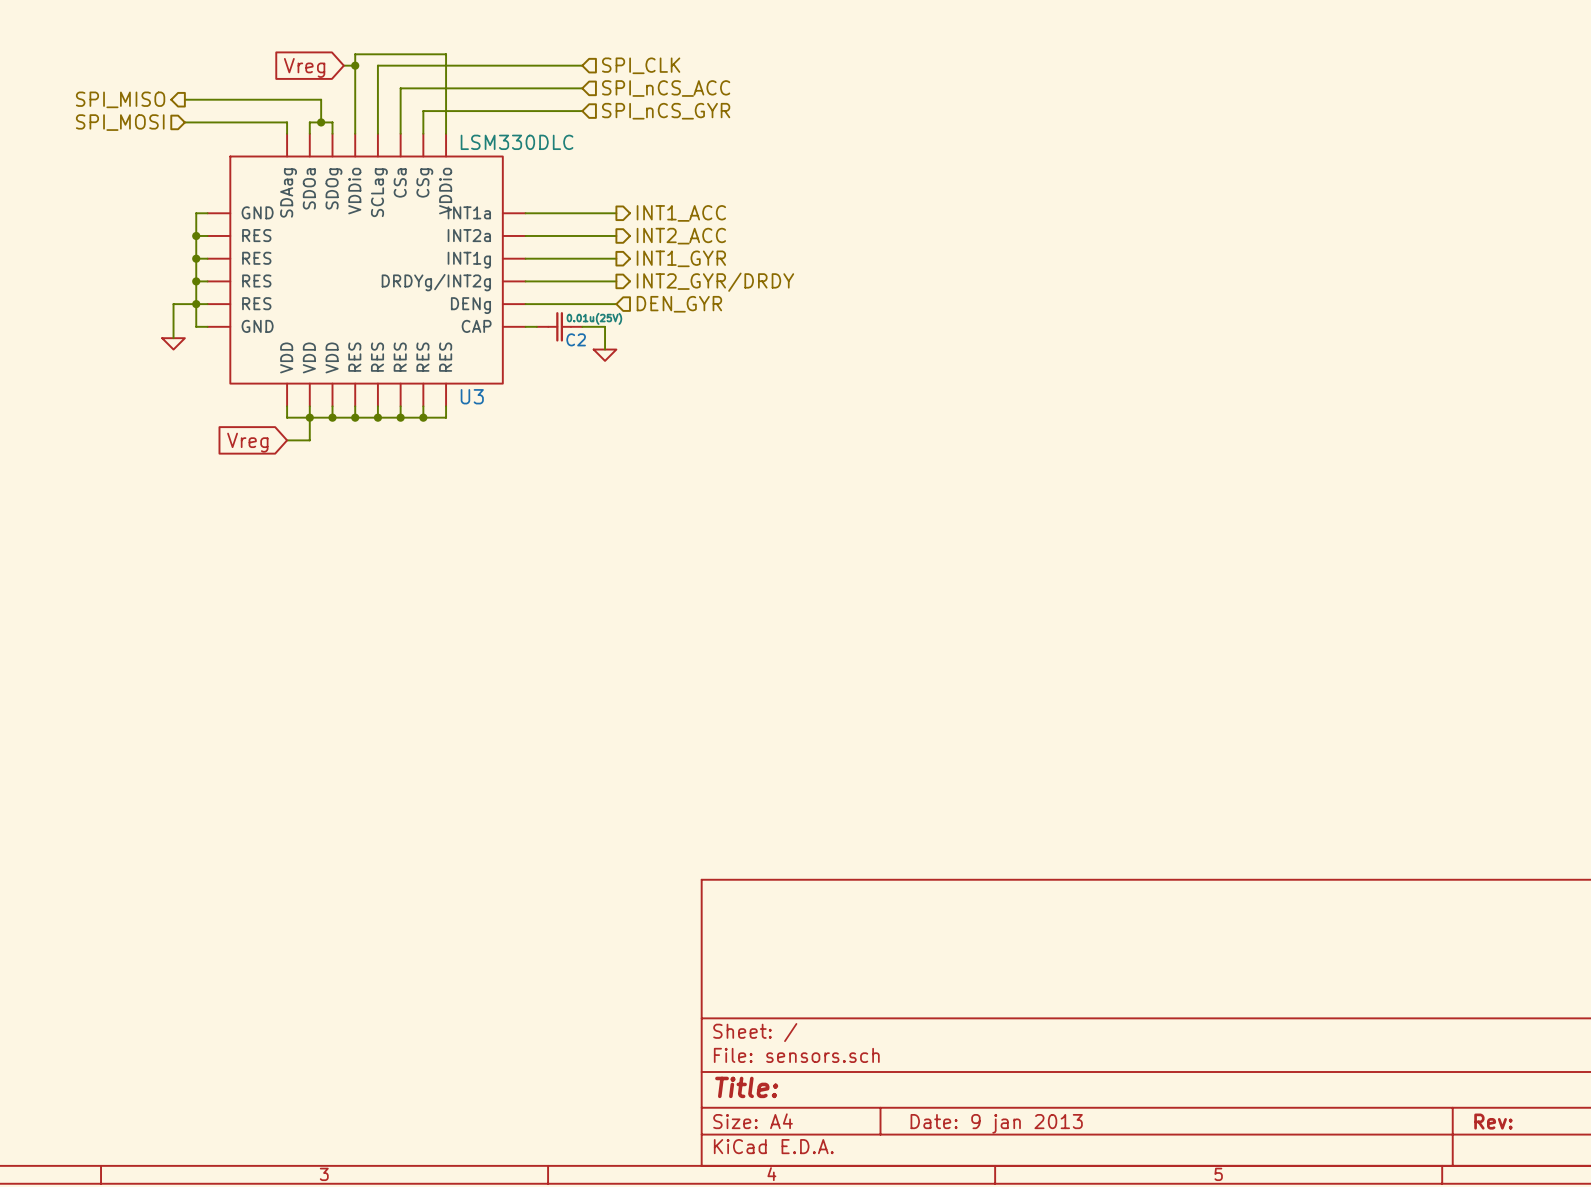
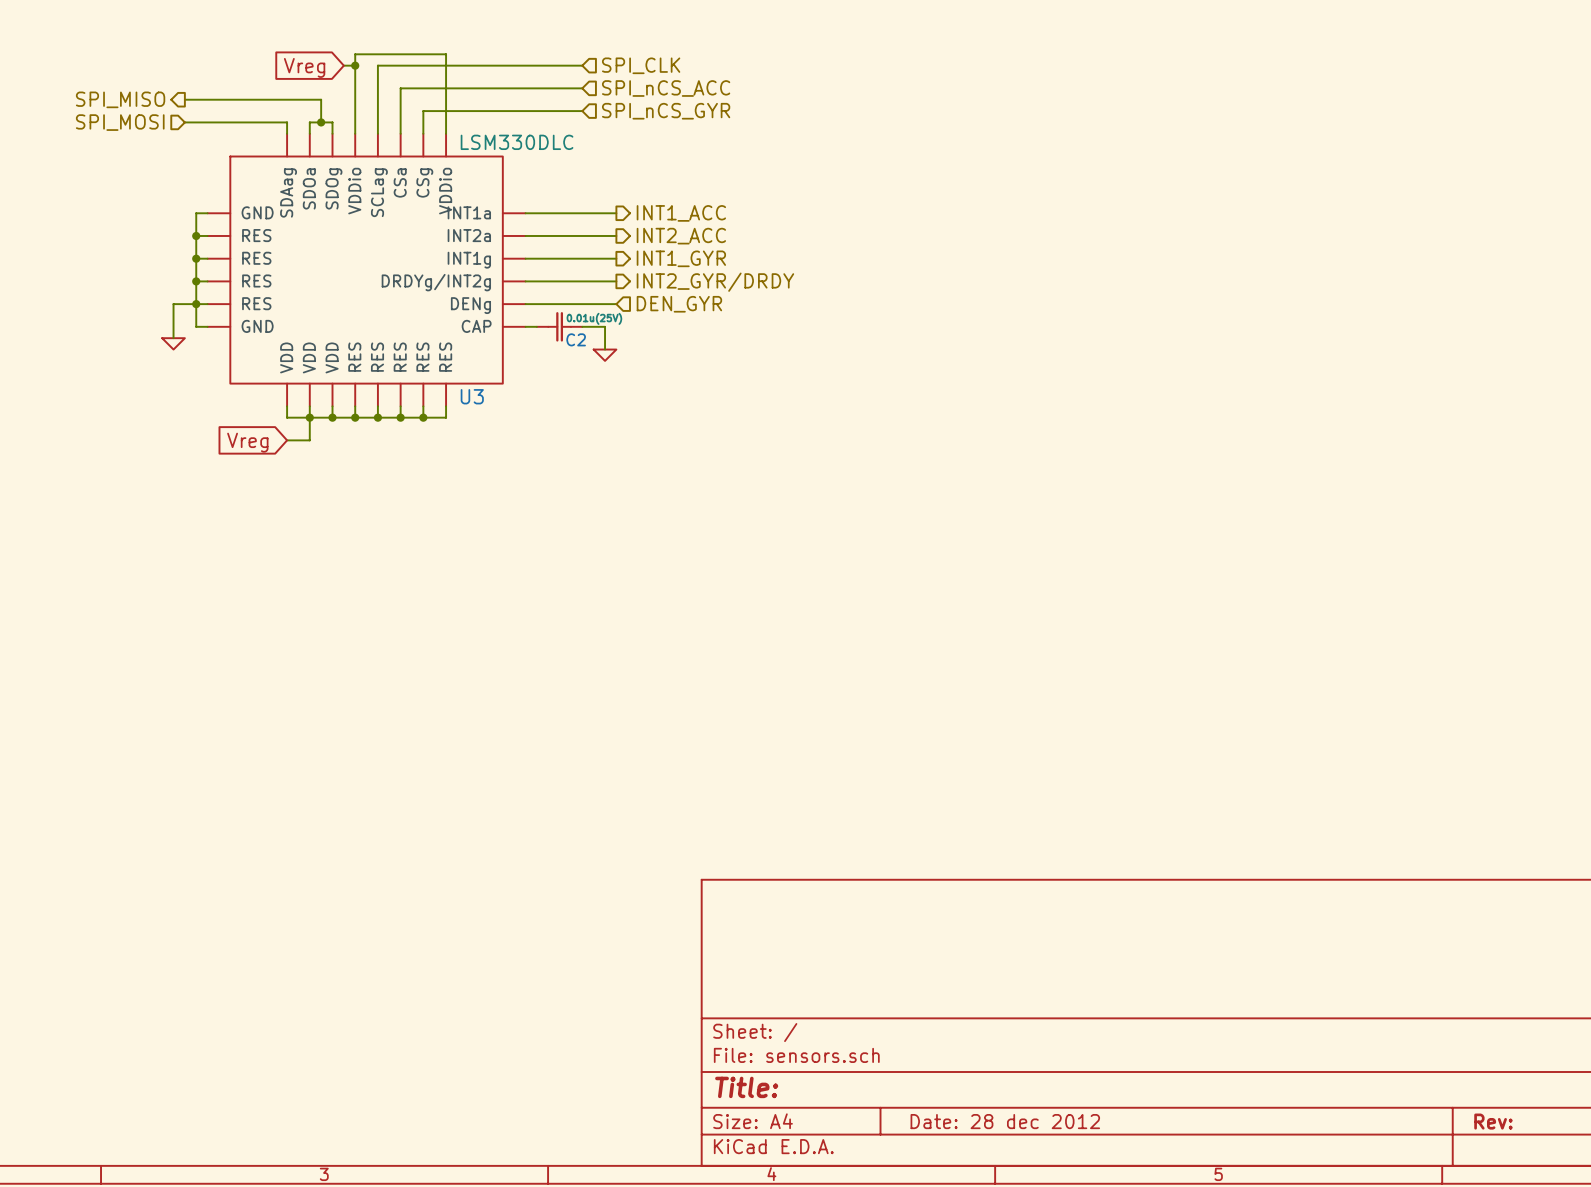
title block: Date: 9 jan 2013 (996, 1123) -> Date: 28 dec 2012 (1005, 1121)

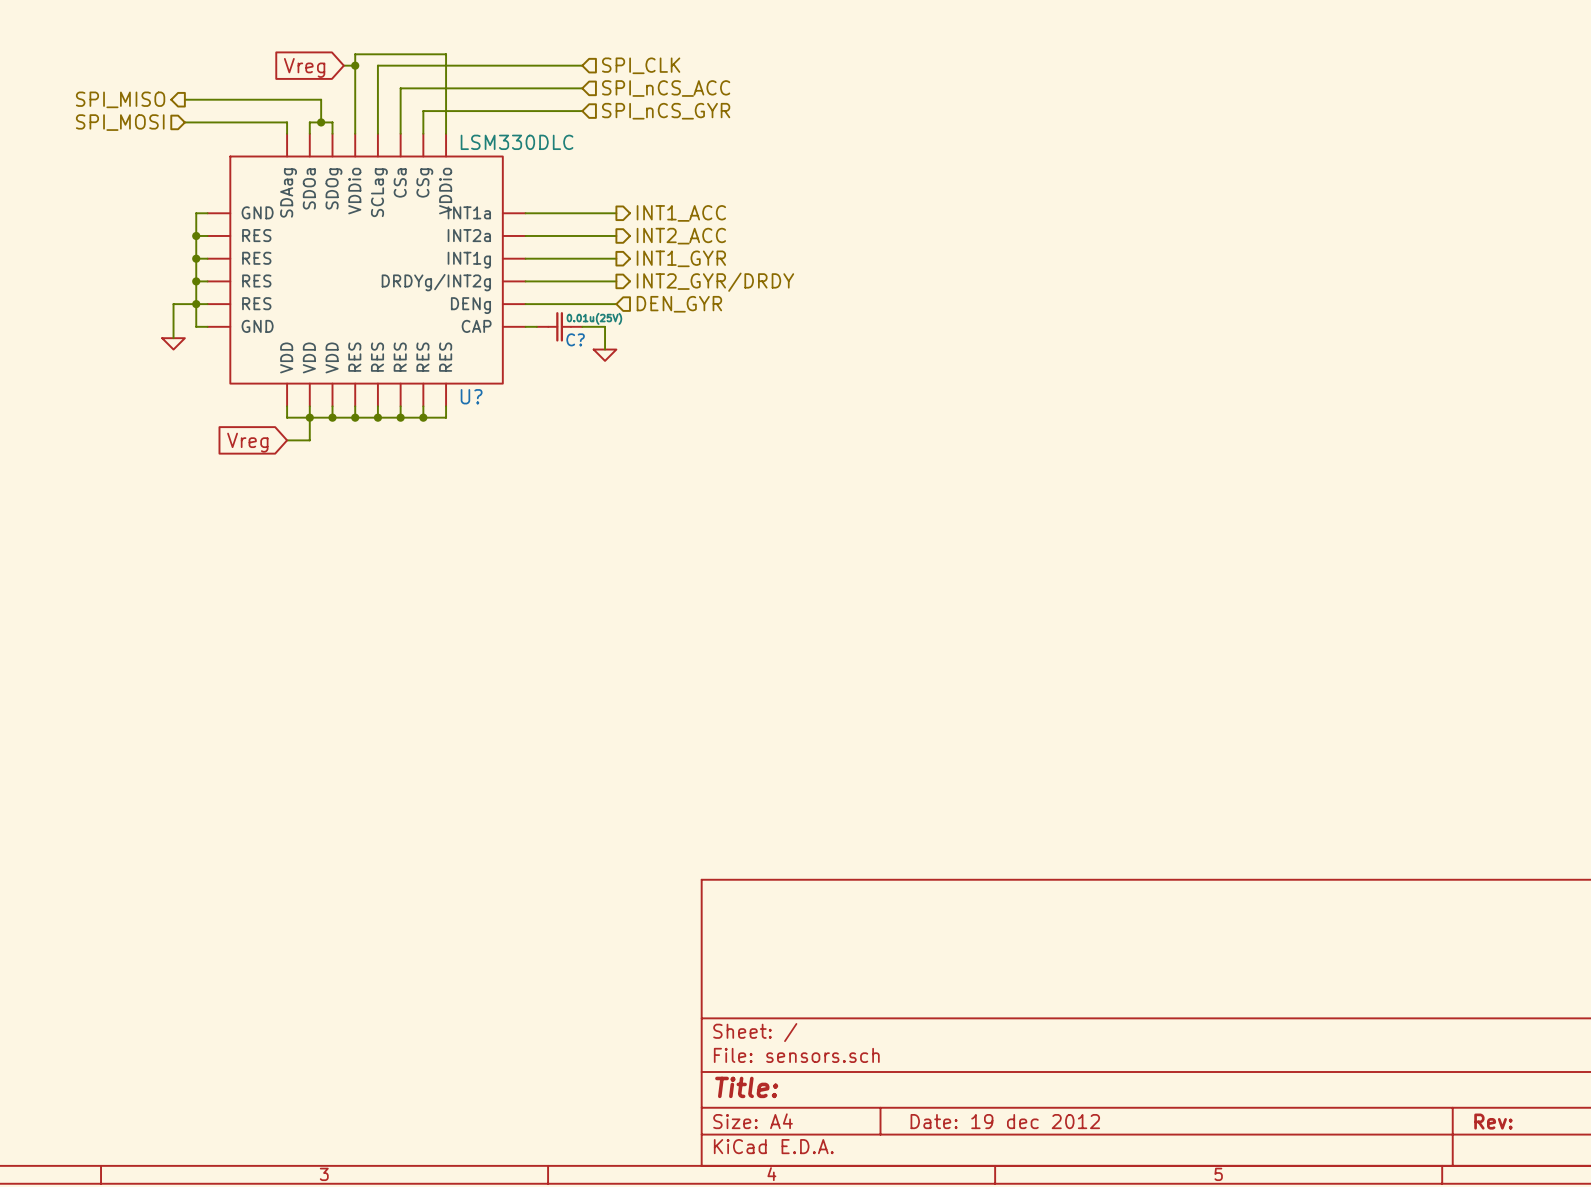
C2 name: C2 (576, 339) -> C? (575, 339)
U3 name: U3 (472, 396) -> U? (471, 396)
title block: Date: 28 dec 2012 (1005, 1121) -> Date: 19 dec 2012 (1005, 1121)

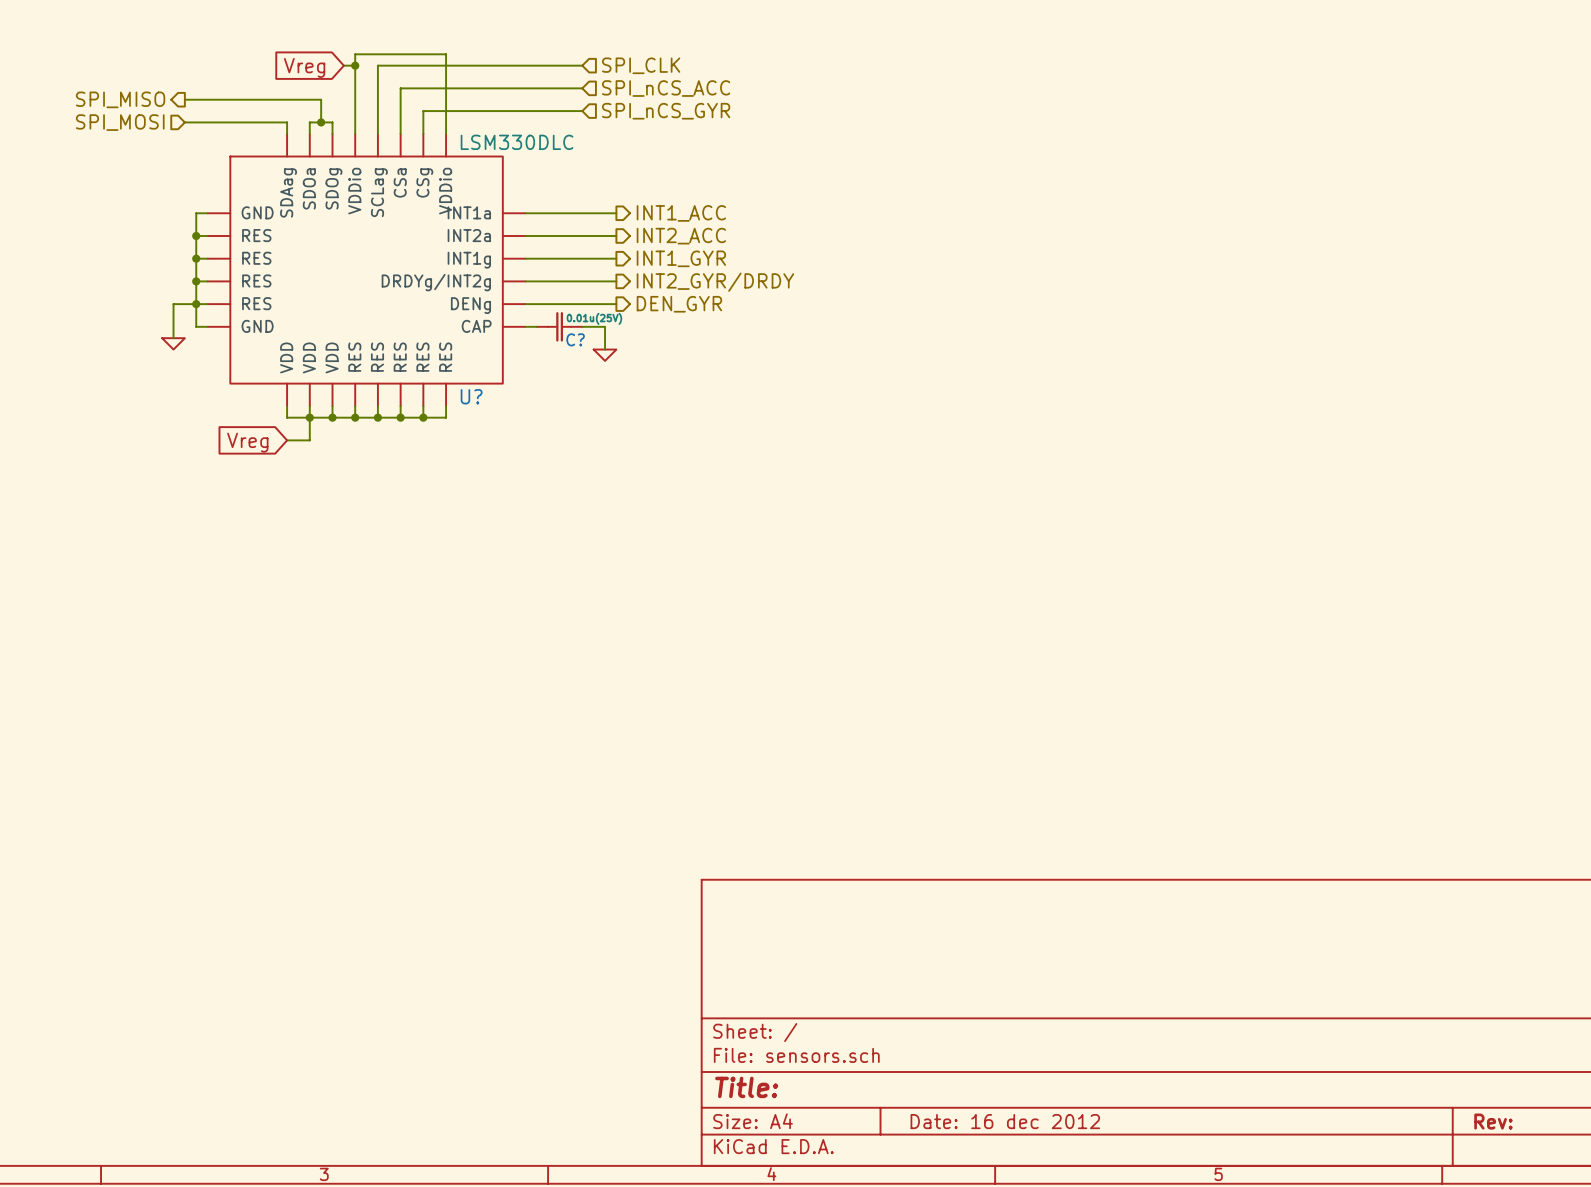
hierarchical label shape: input (679, 304) -> output (679, 304)
title block: Date: 19 dec 2012 (1005, 1121) -> Date: 16 dec 2012 (1005, 1121)

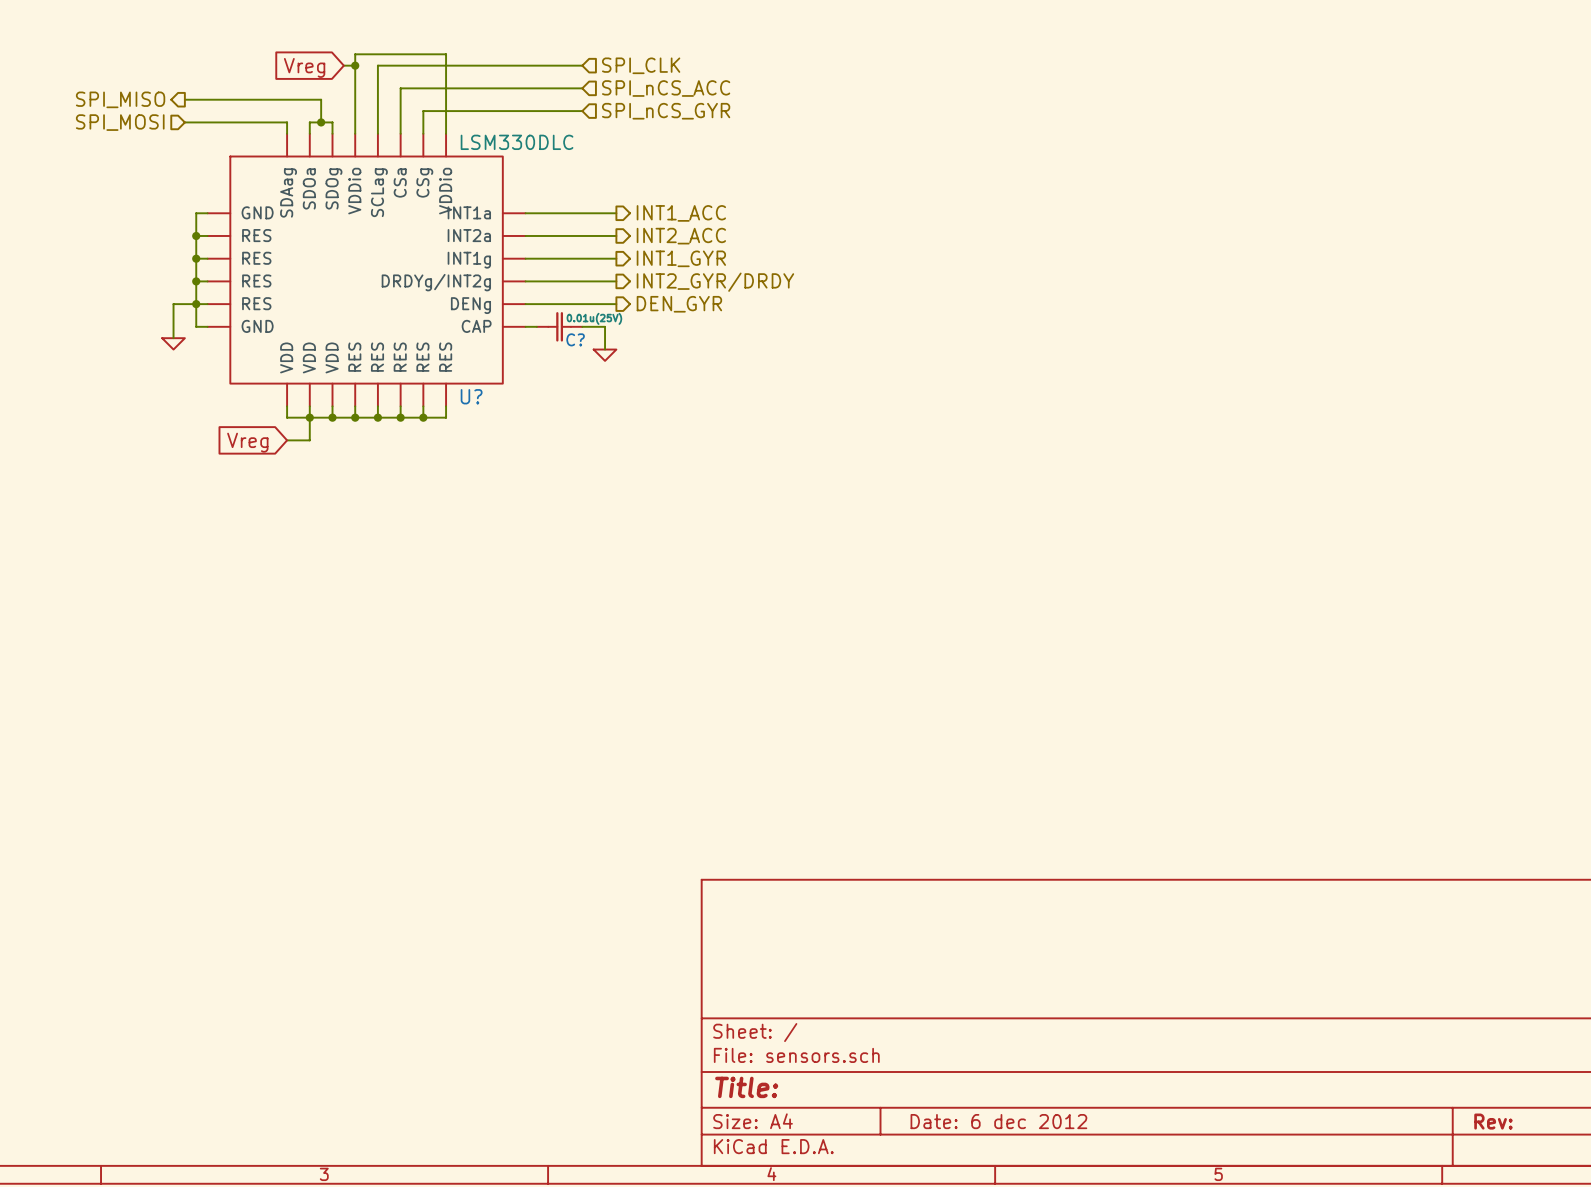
title block: Date: 16 dec 2012 (1005, 1121) -> Date: 6 dec 2012 (998, 1121)

